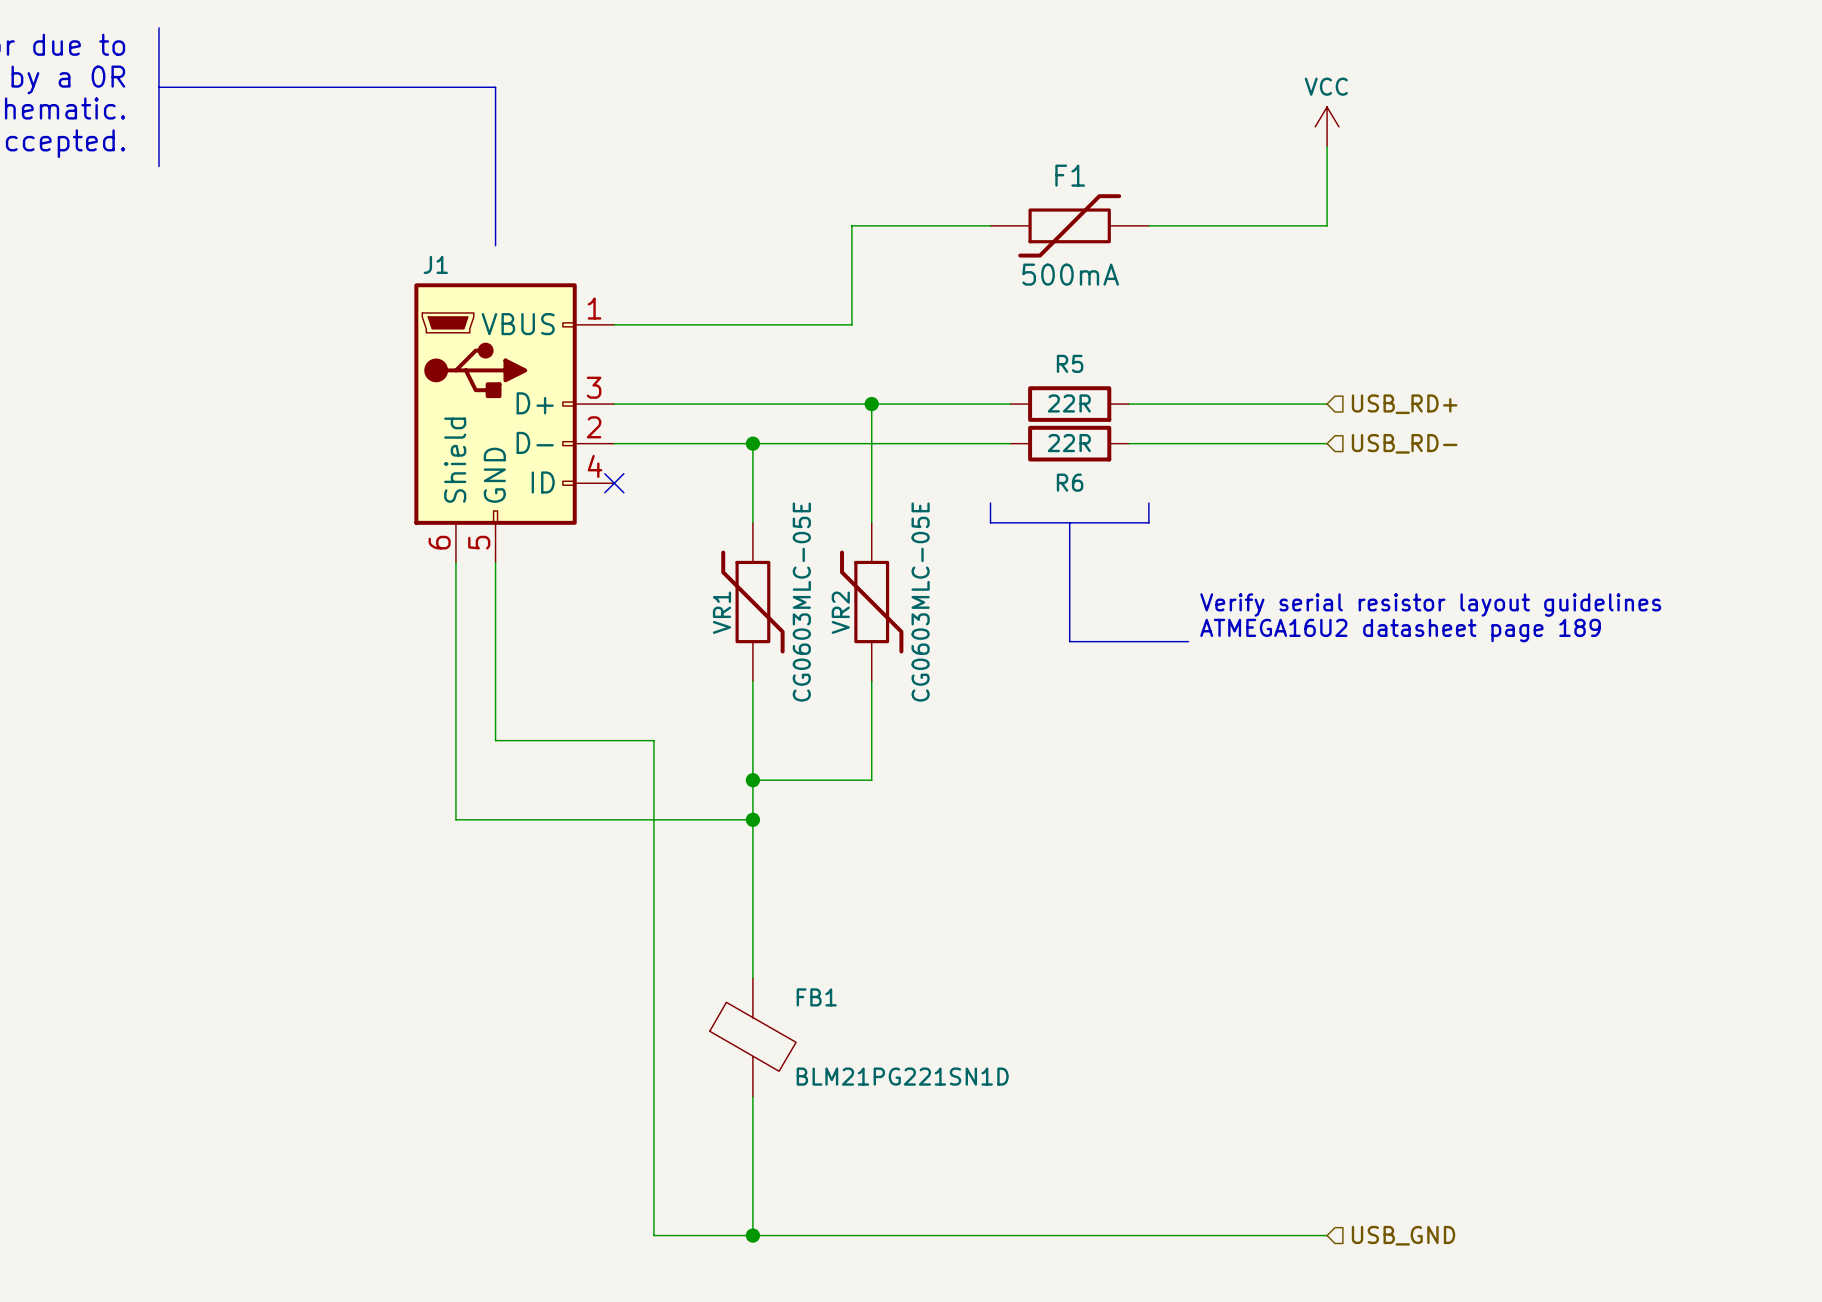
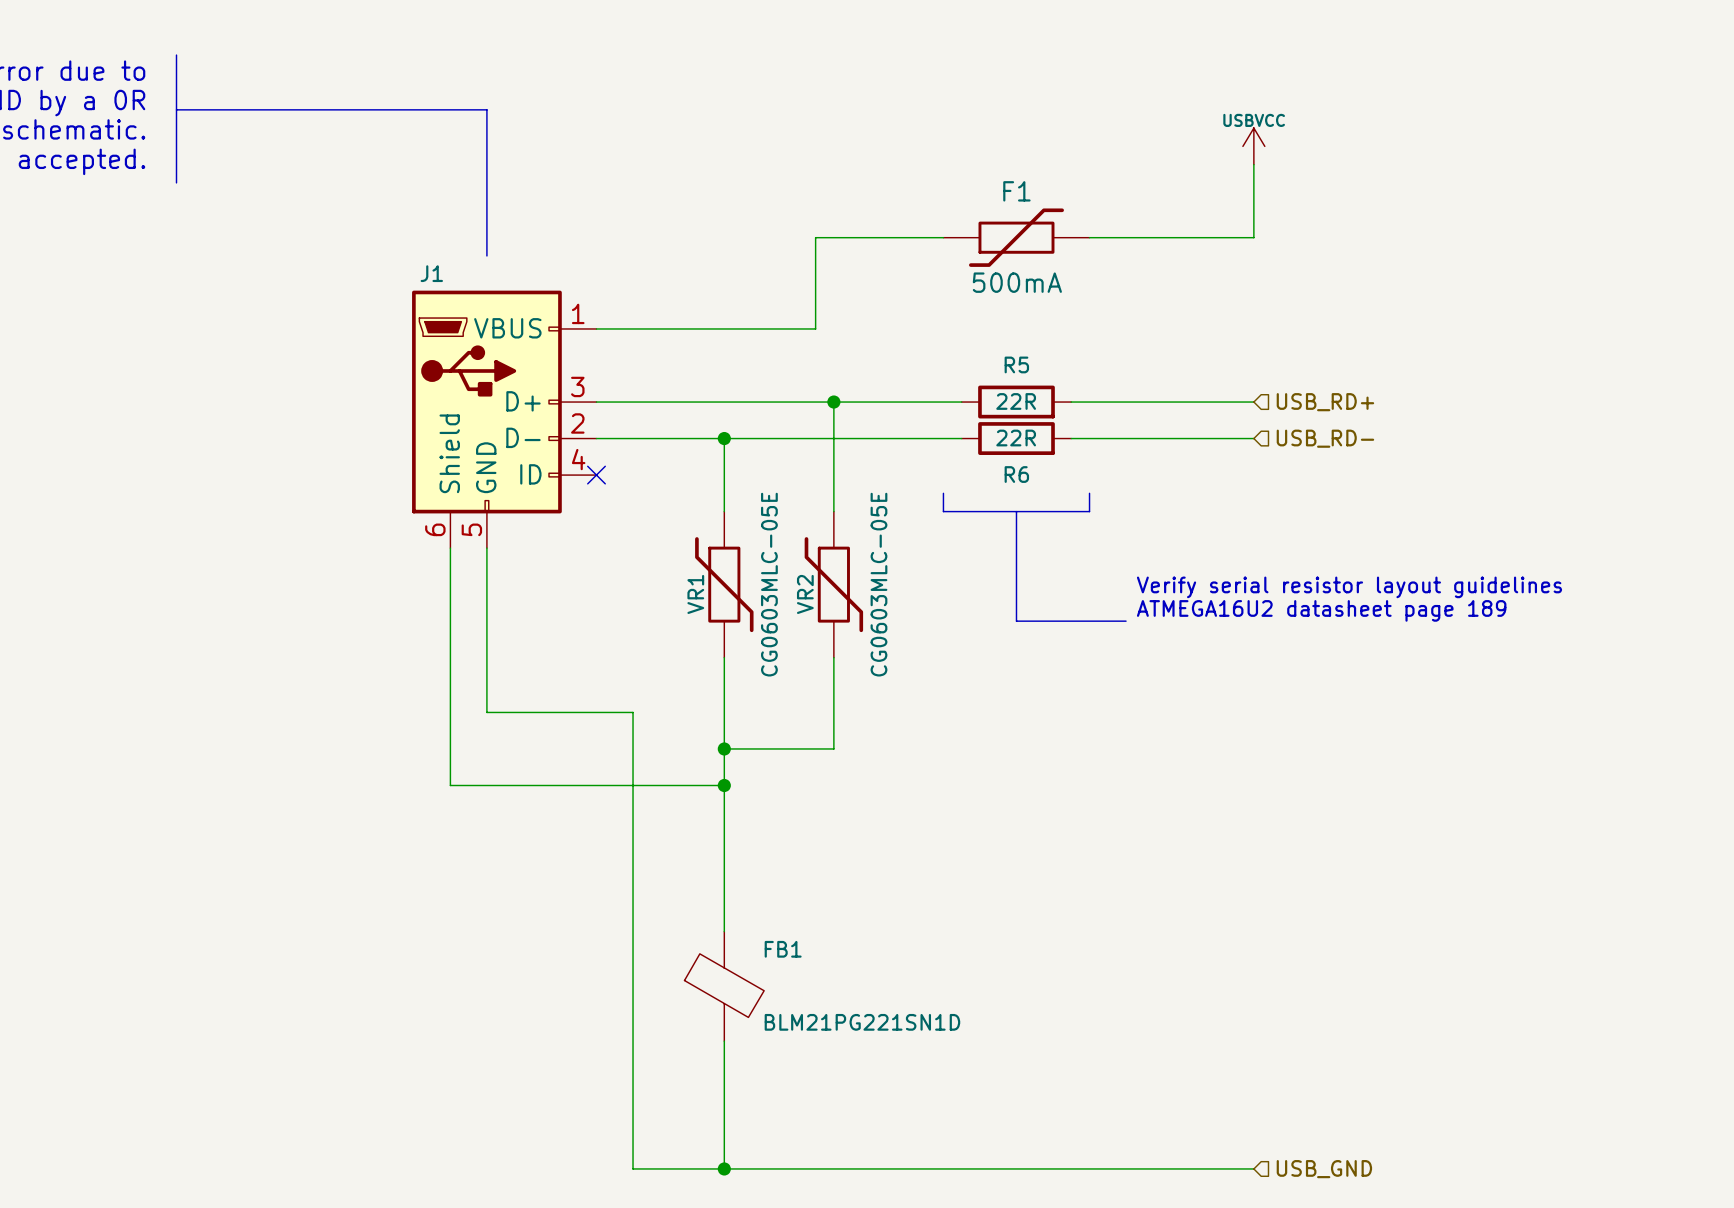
power symbol: VCC (1327, 126) -> USBVCC (1253, 146)

